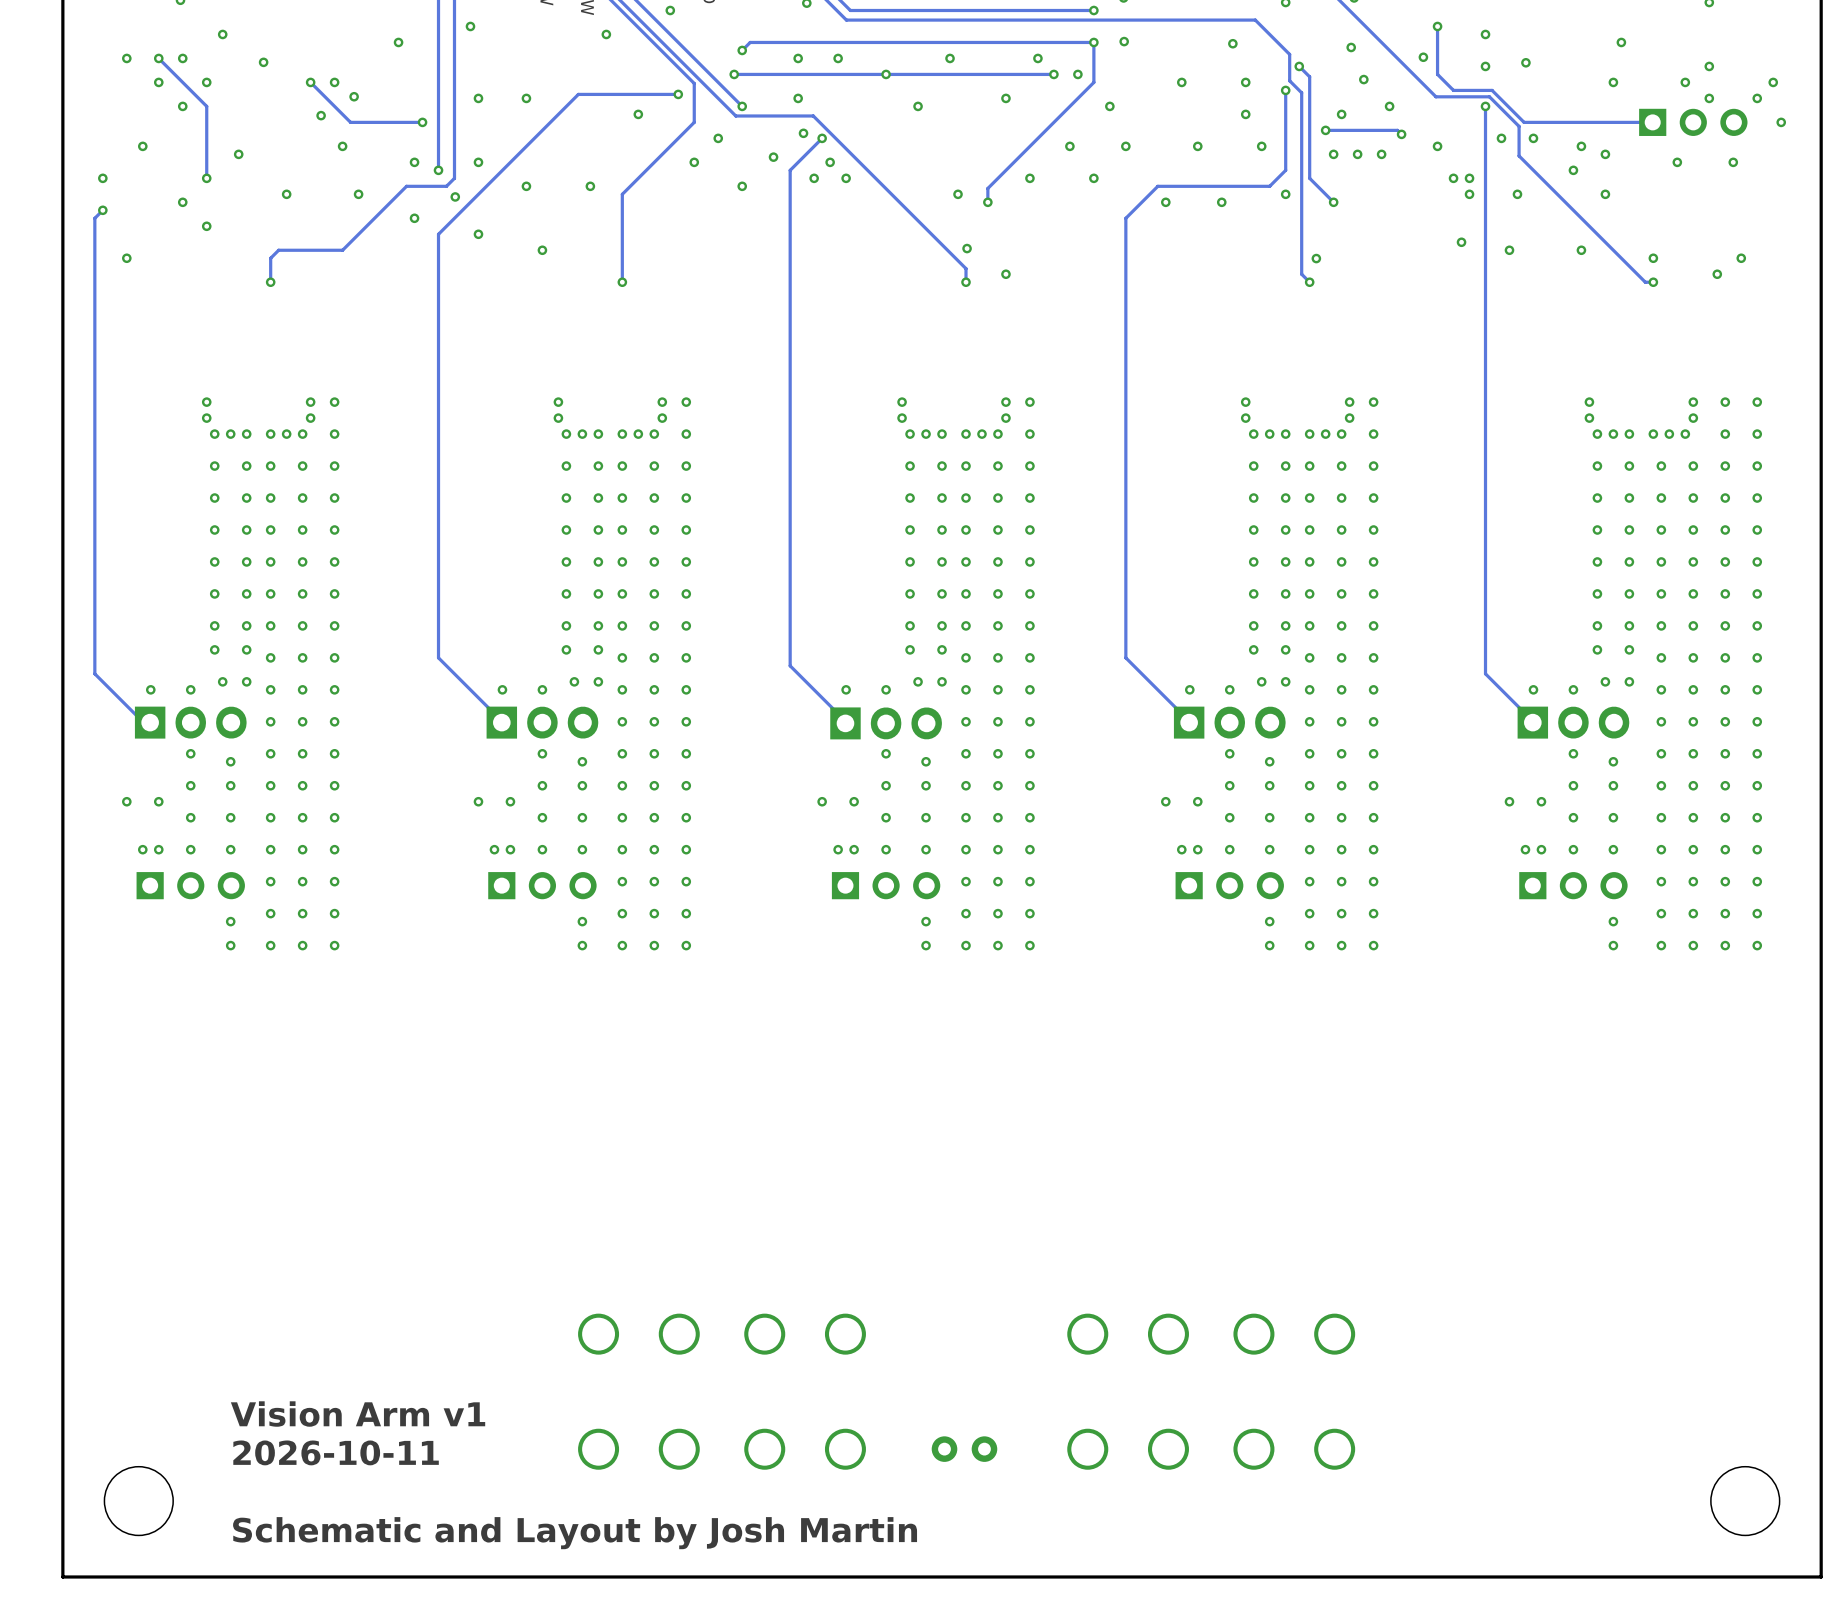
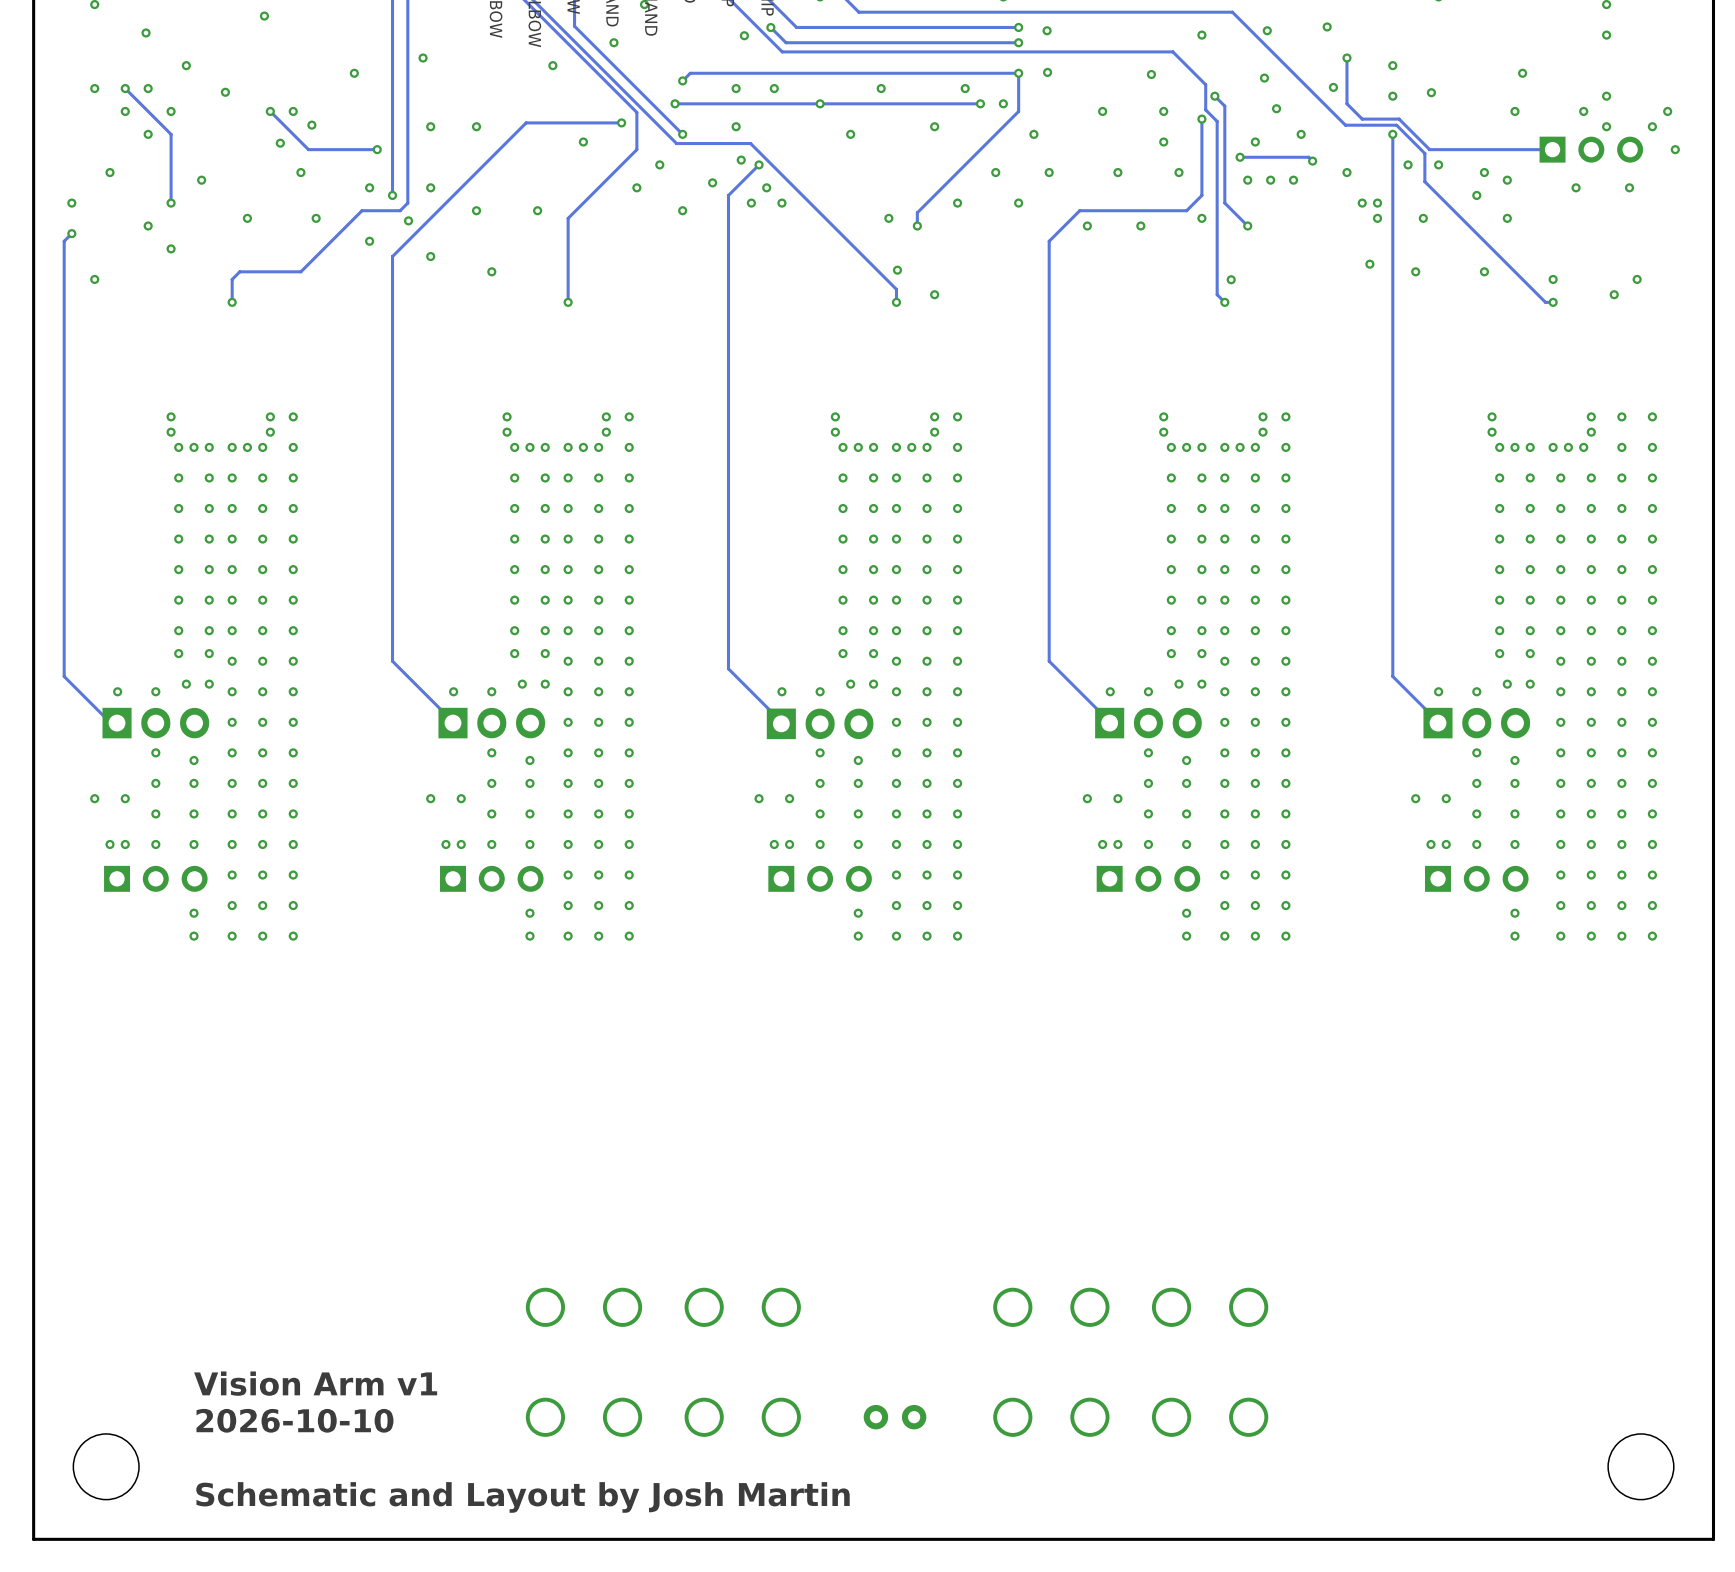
text: 2026-10-11 (336, 1452) -> 2026-10-10 (294, 1420)

